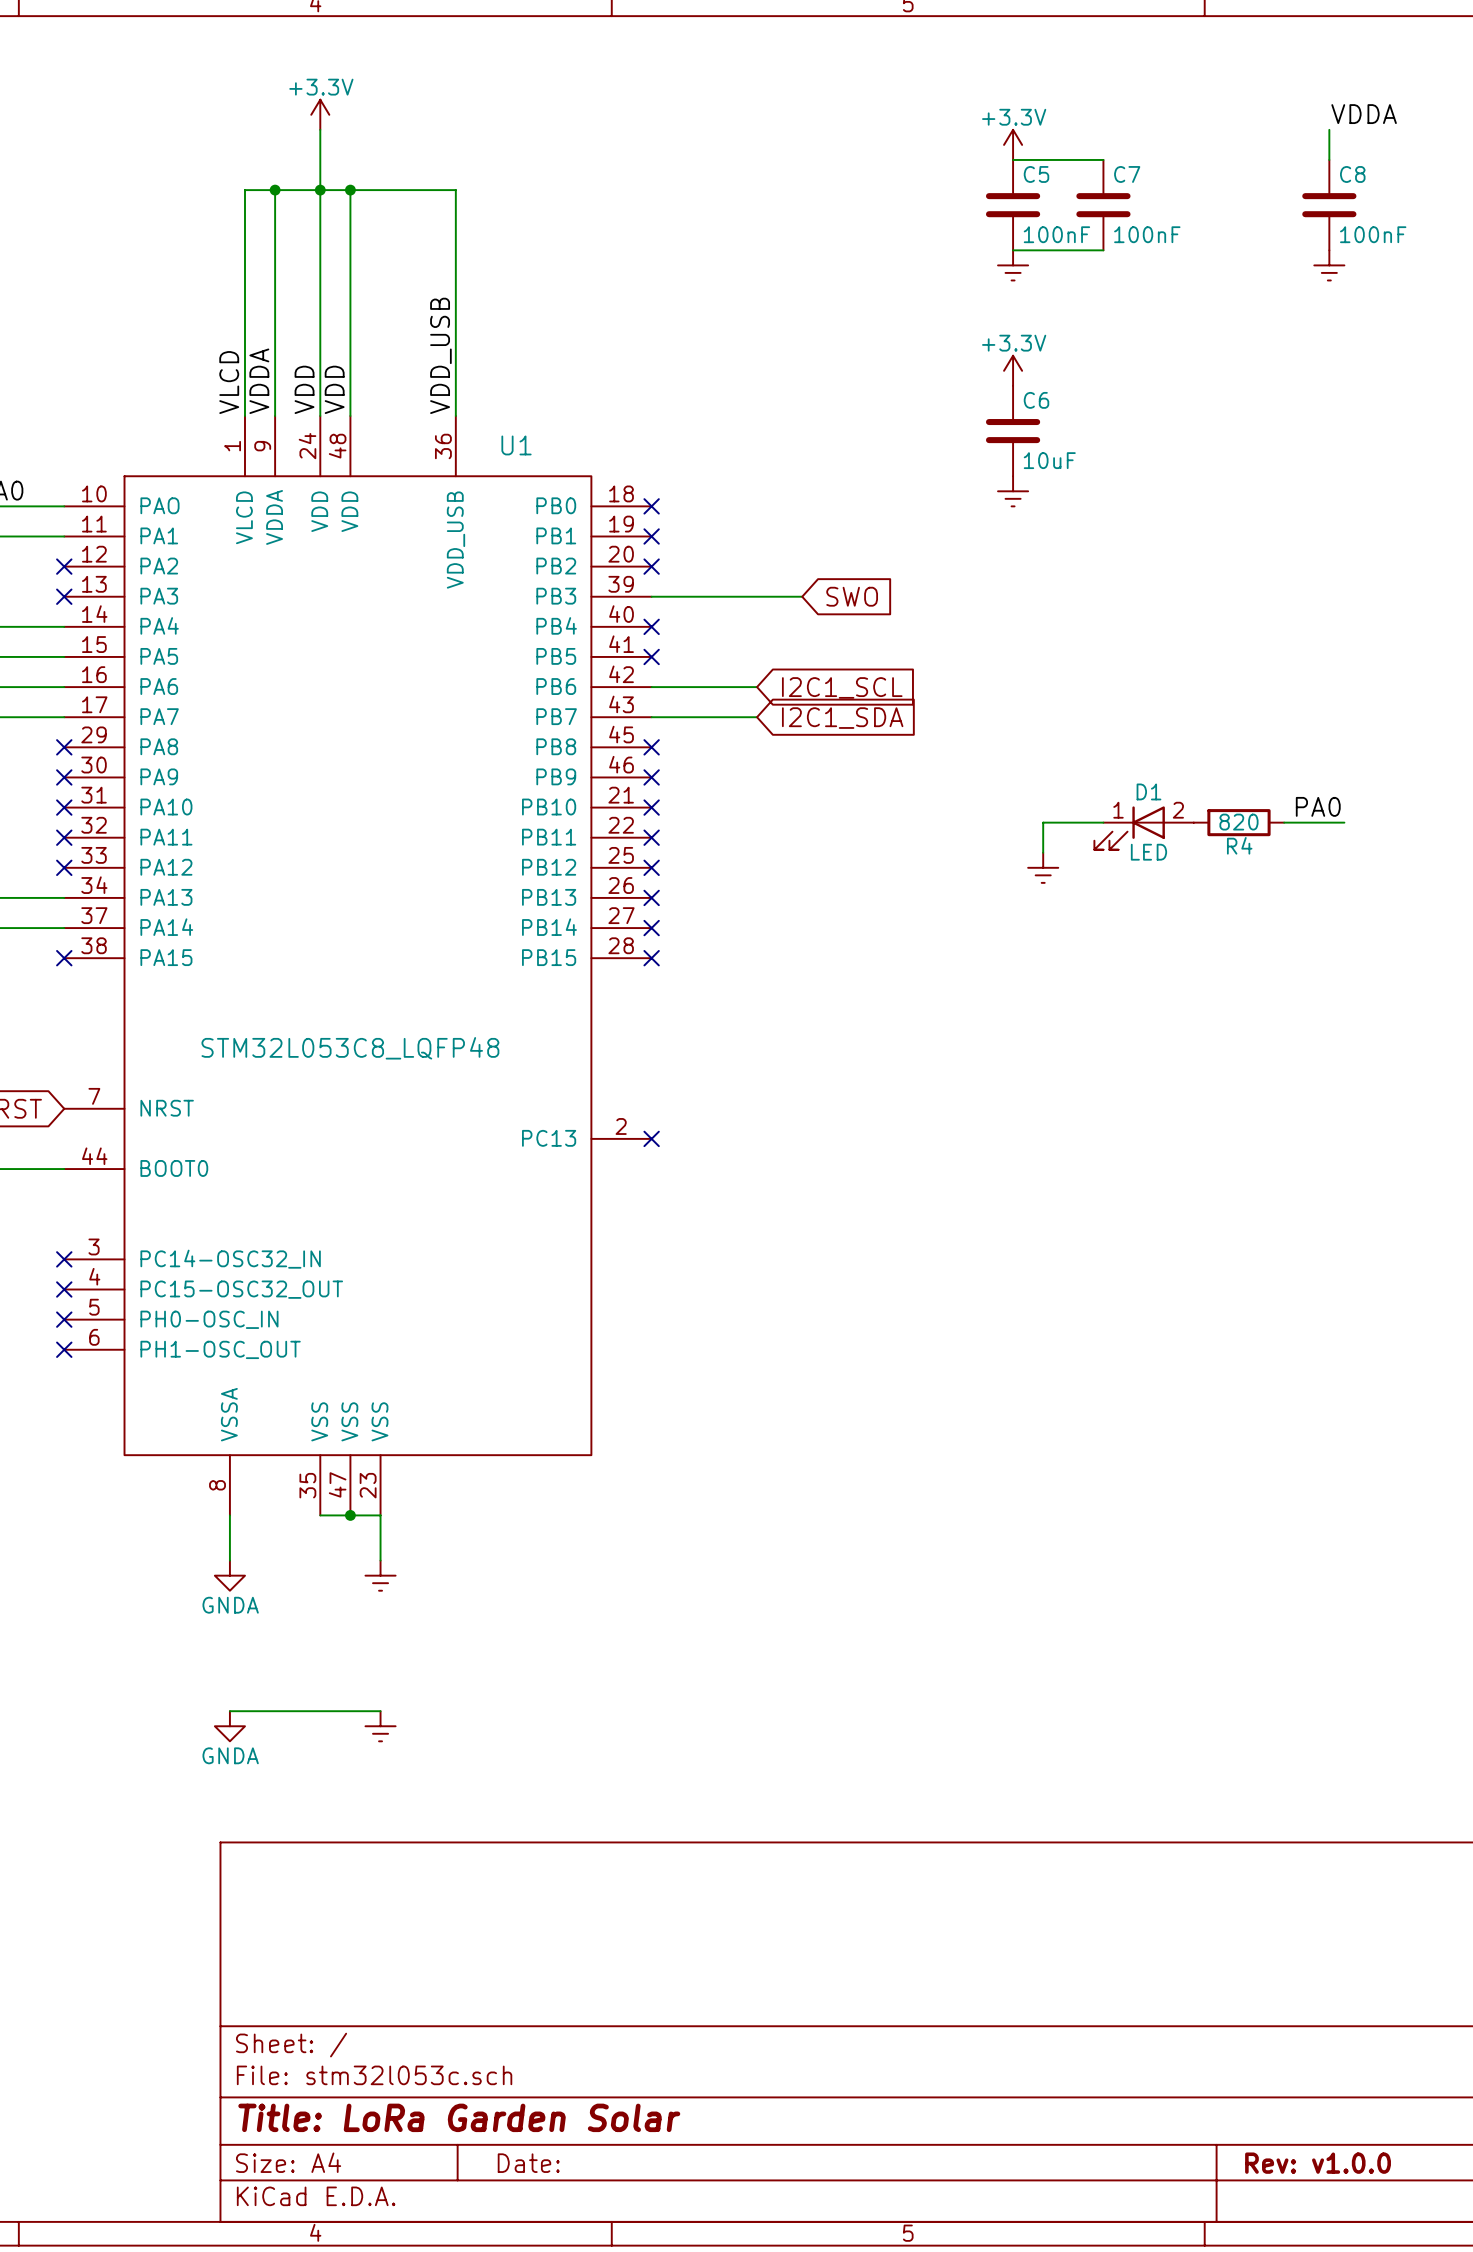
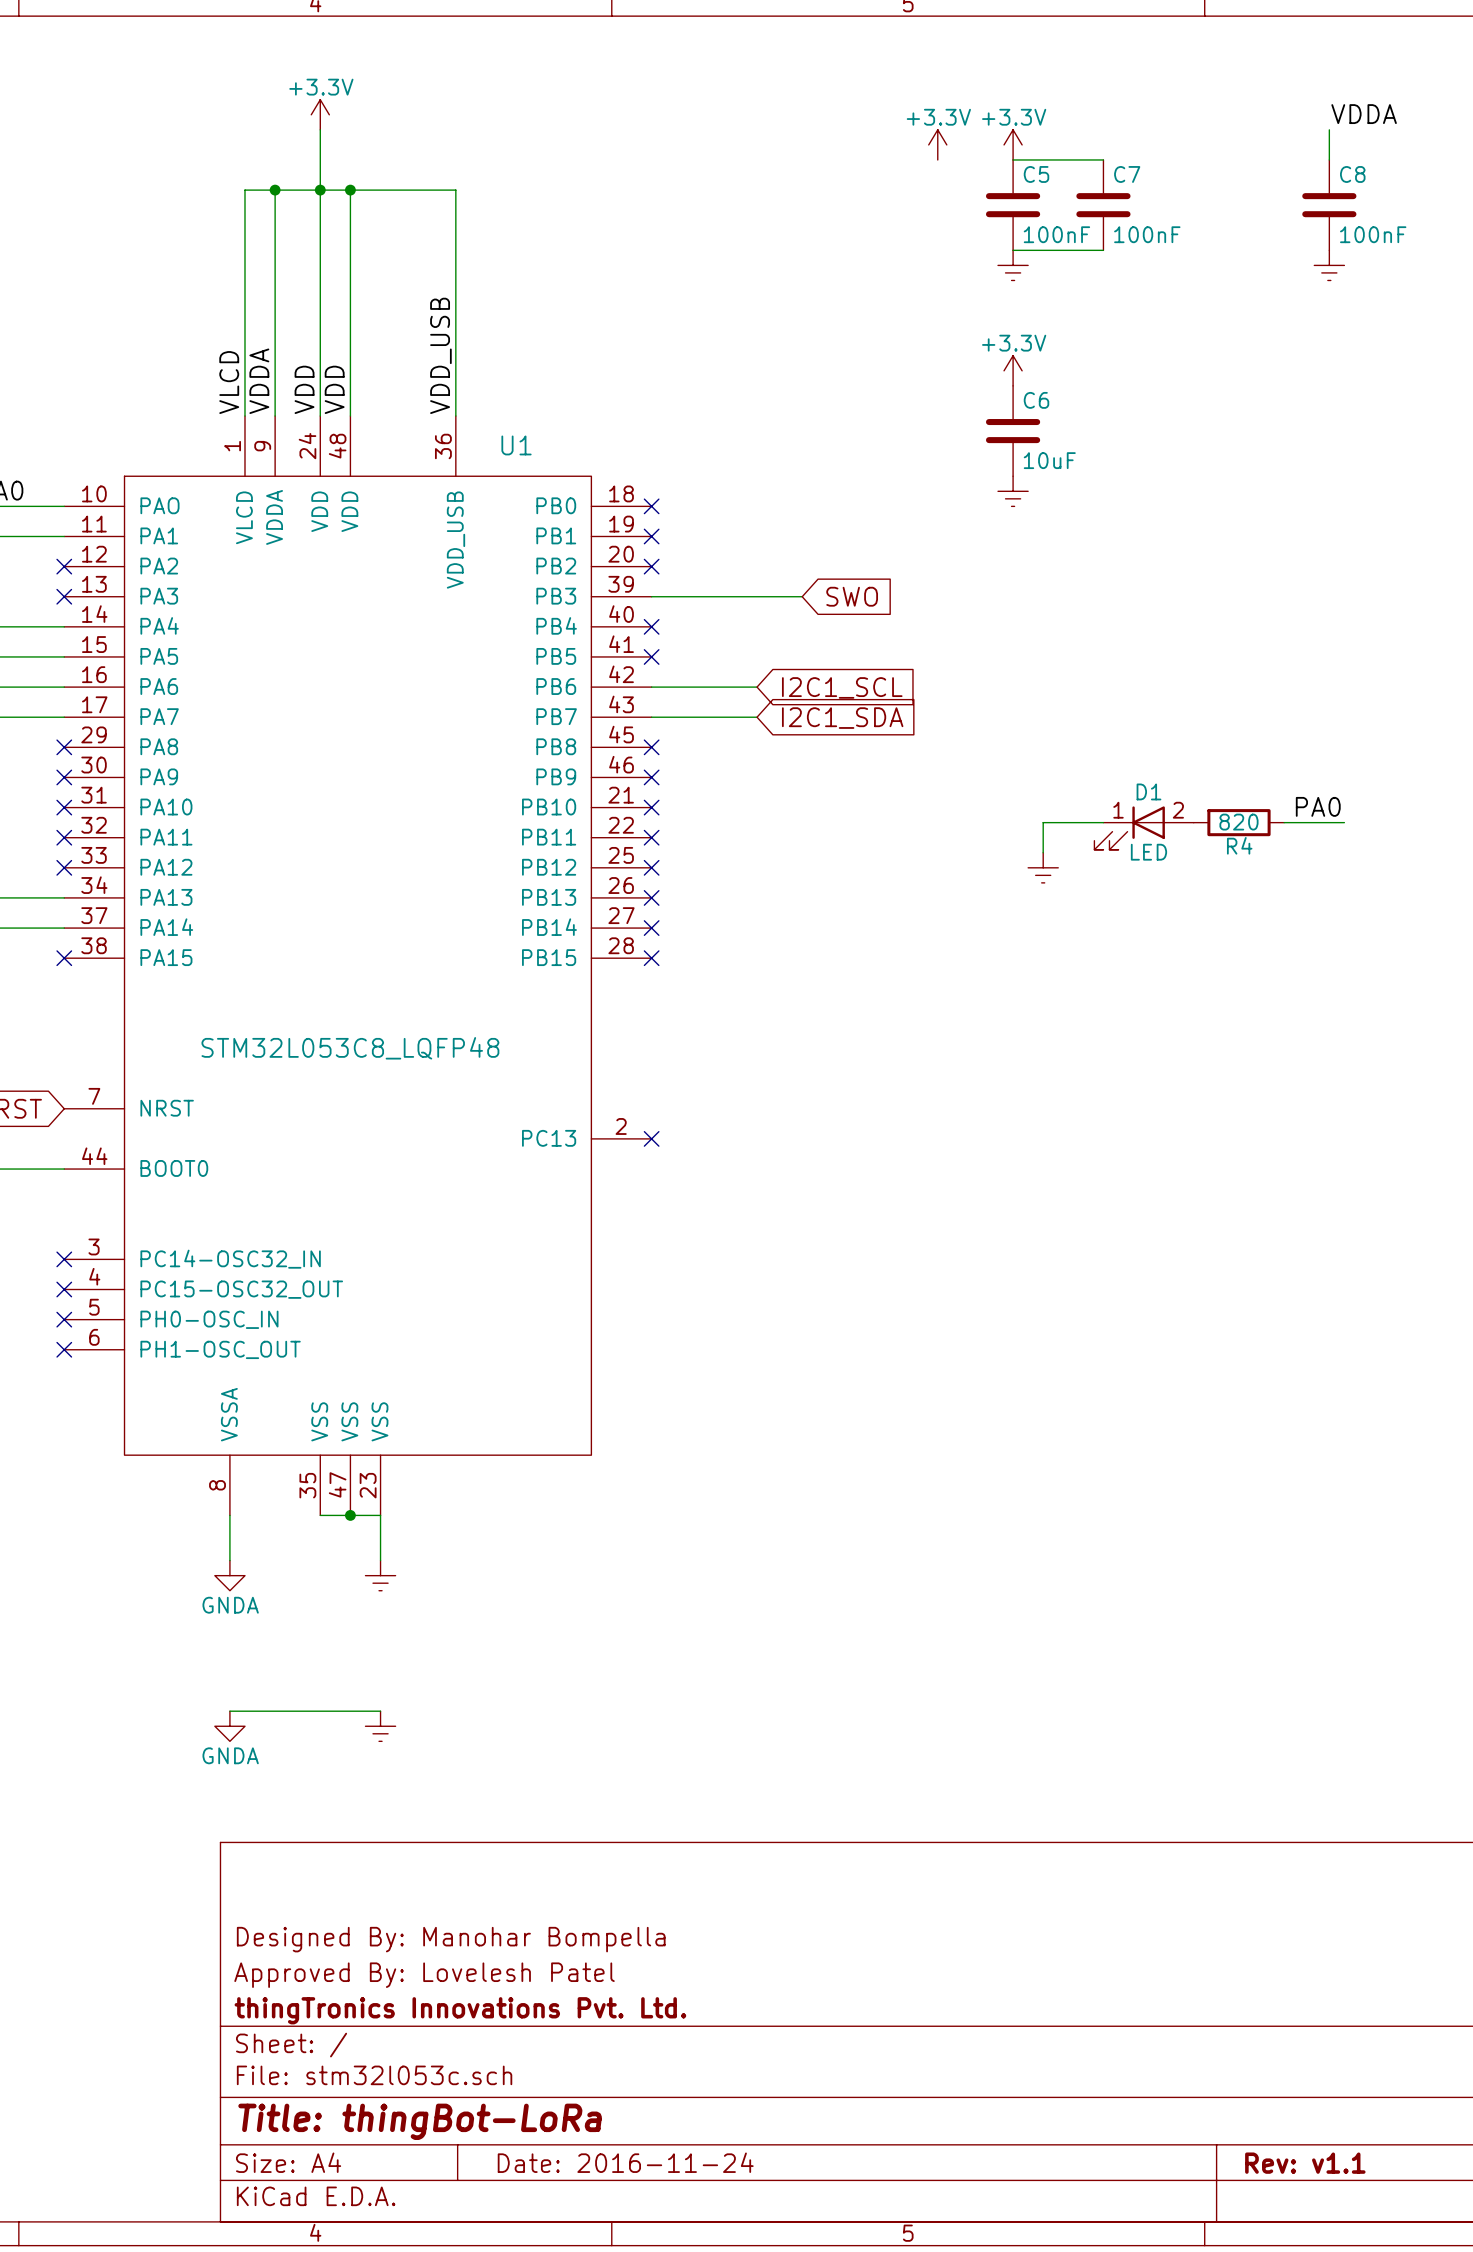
power symbol: none -> +3.3V (937, 144)
title block: none -> Designed By: Manohar Bompella (451, 1939)
title block: none -> Approved By: Lovelesh Patel (424, 1975)
title block: none -> thingTronics Innovations Pvt. Ltd. (460, 2010)
title block: Title: LoRa Garden Solar (459, 2117) -> Title: thingBot-LoRa (420, 2121)
title block: Date: (528, 2163) -> Date: 2016-11-24 (625, 2162)
title block: Rev: v1.0.0 (1318, 2163) -> Rev: v1.1 (1305, 2163)

